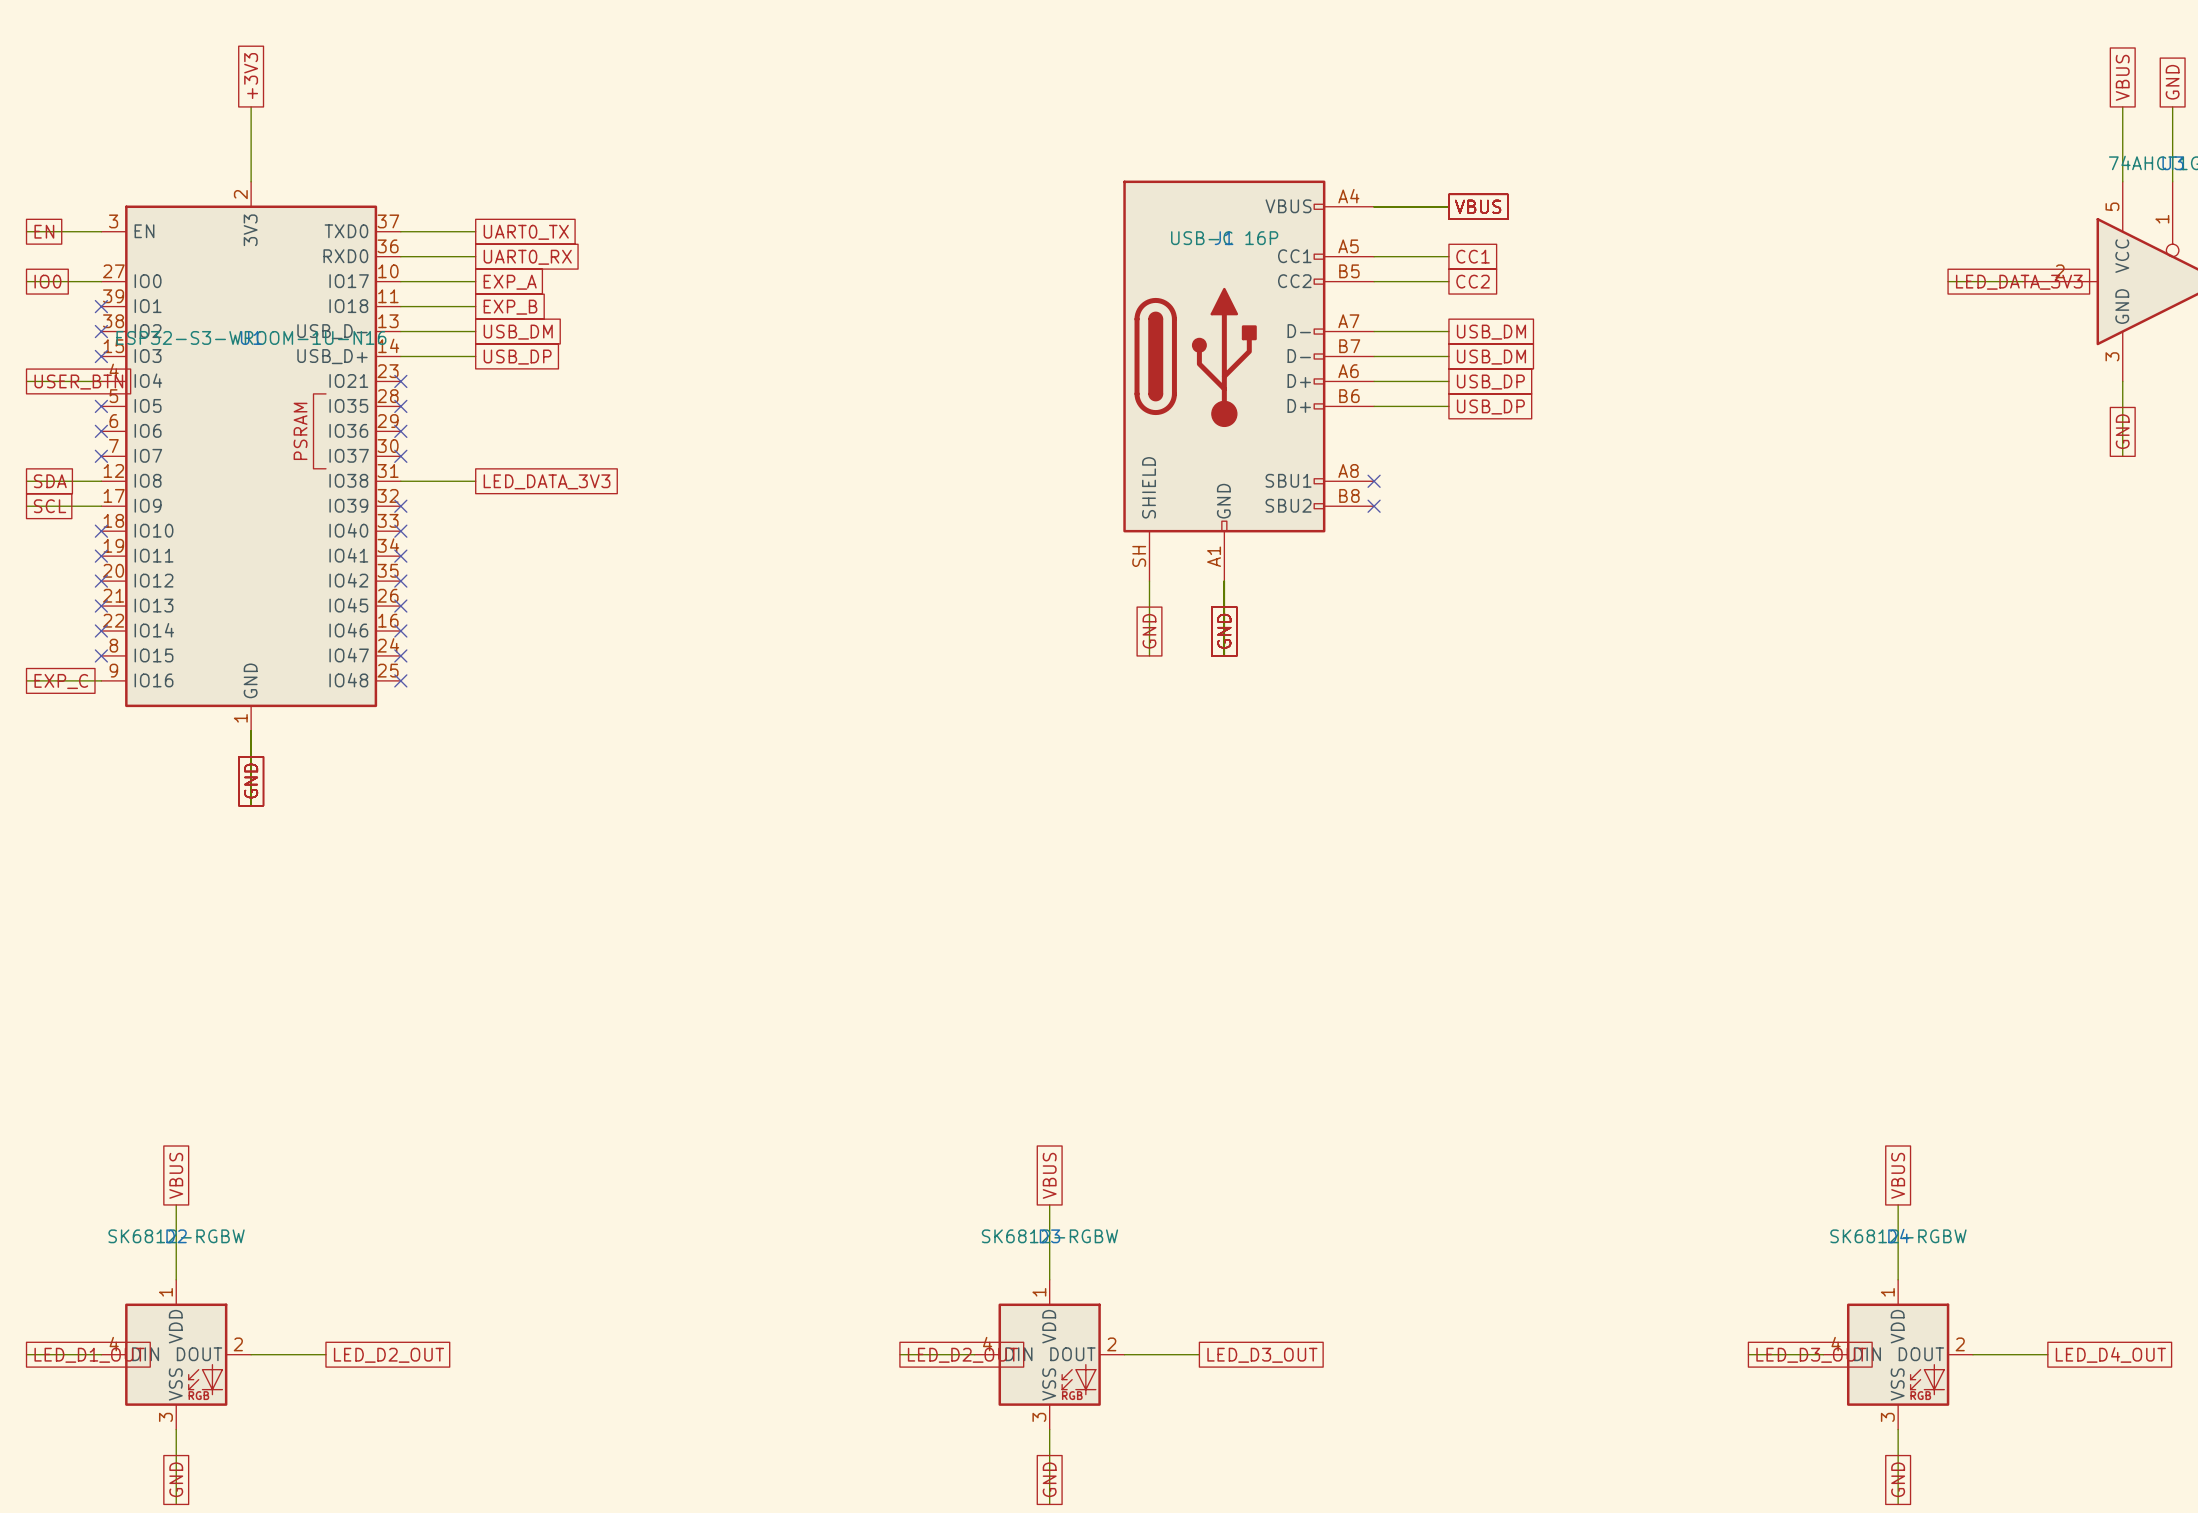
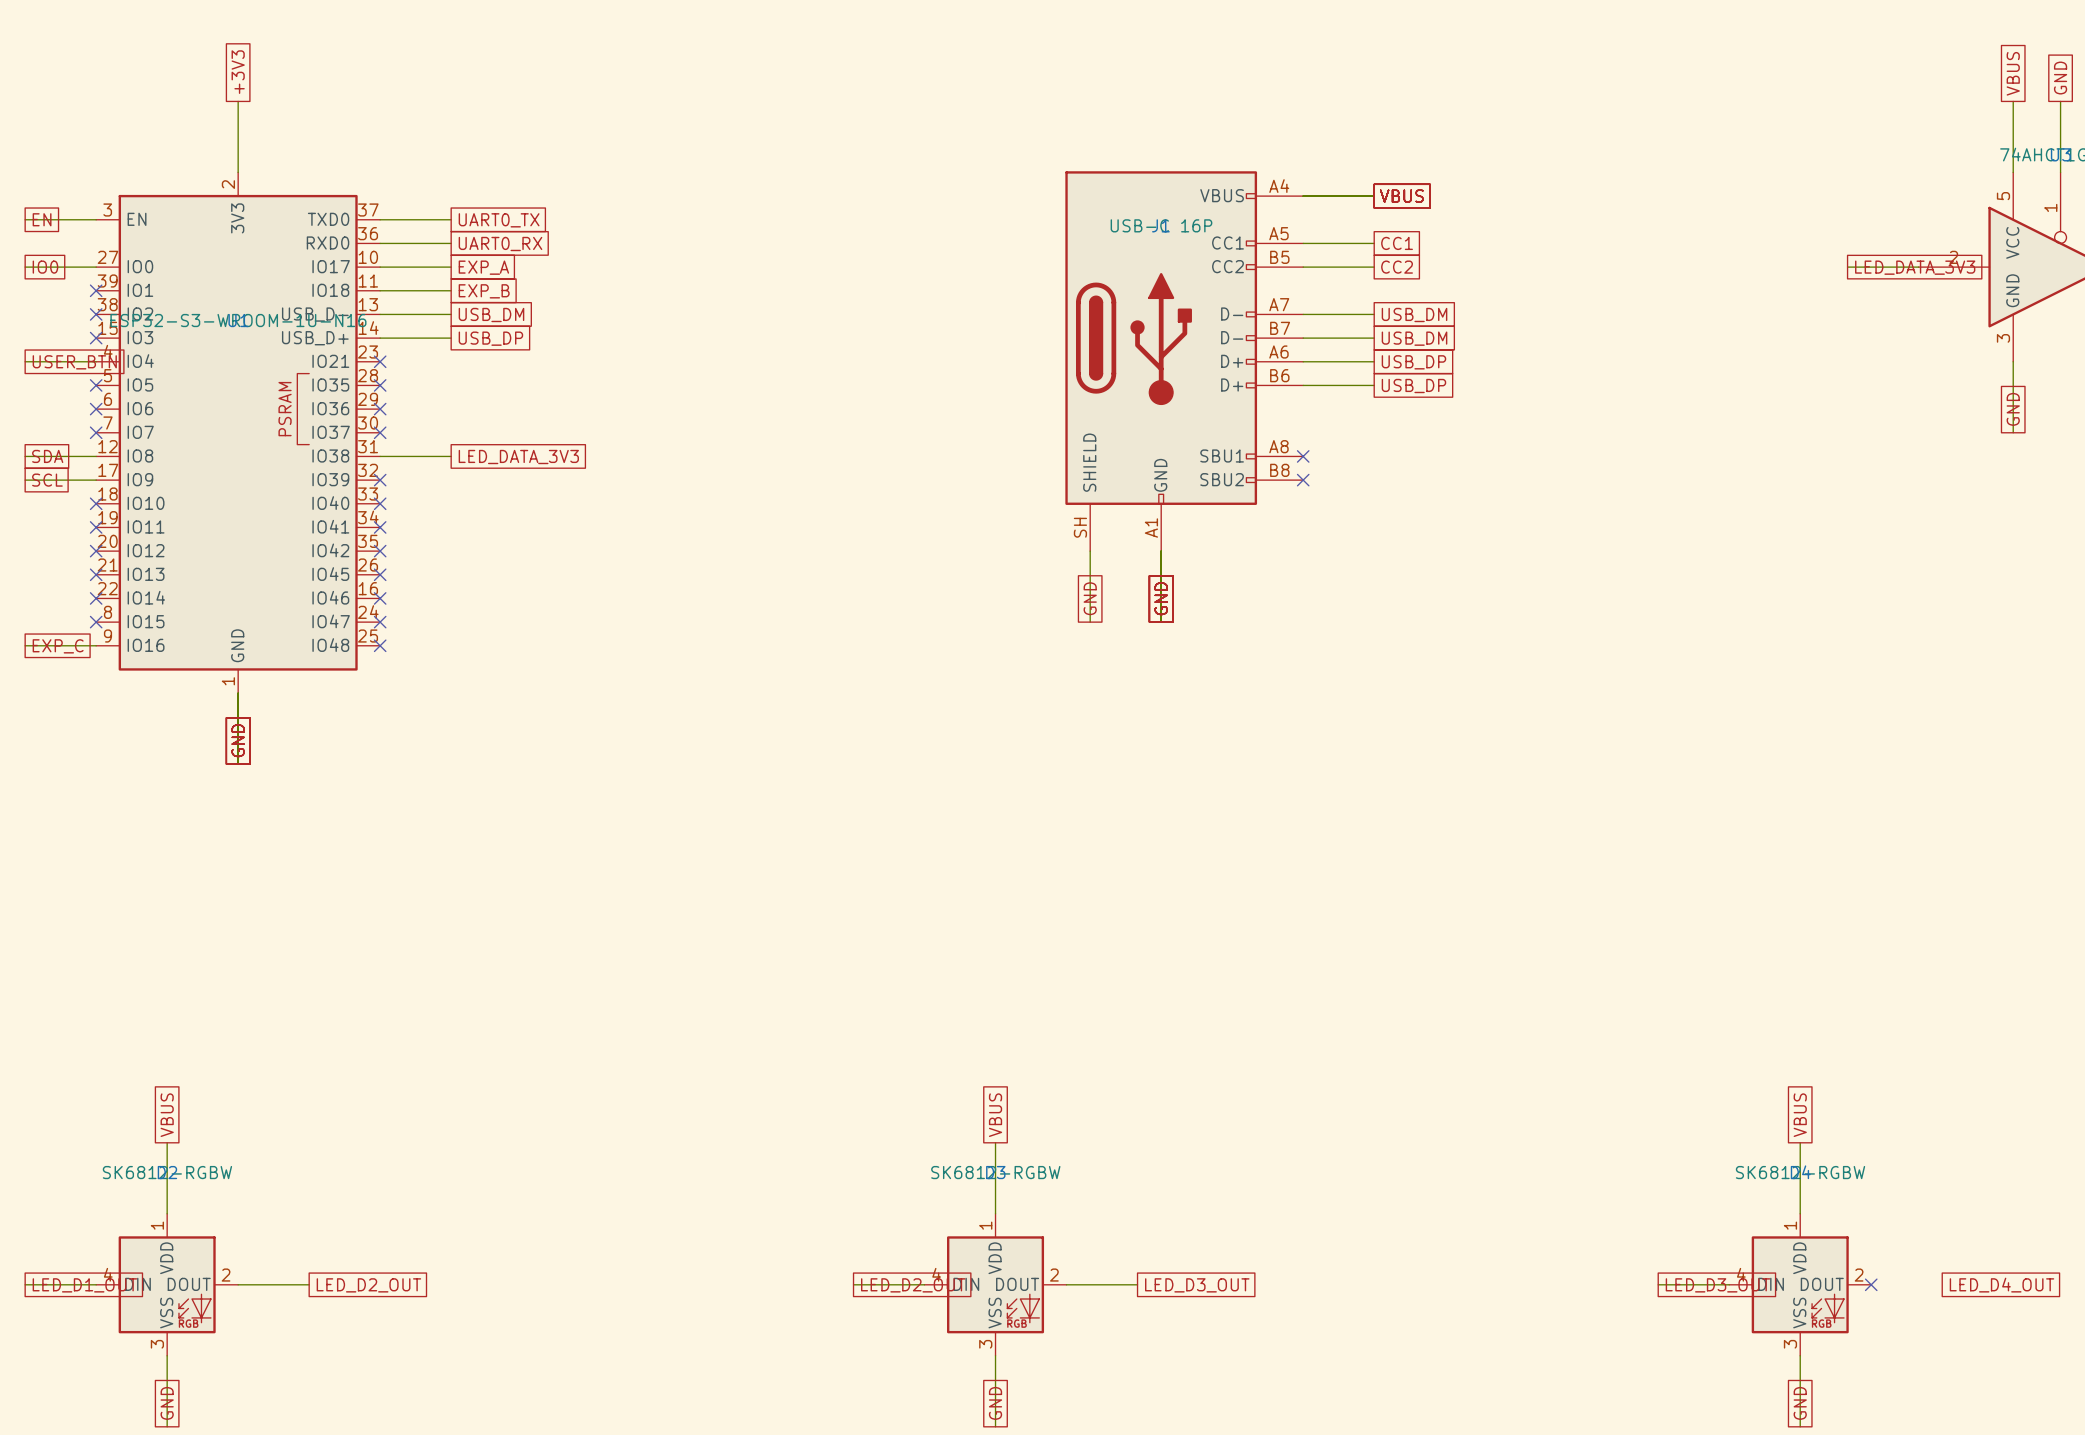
wire: (1973, 1354) (2047, 1354) -> none
no-connect mark: none -> (1871, 1284)

